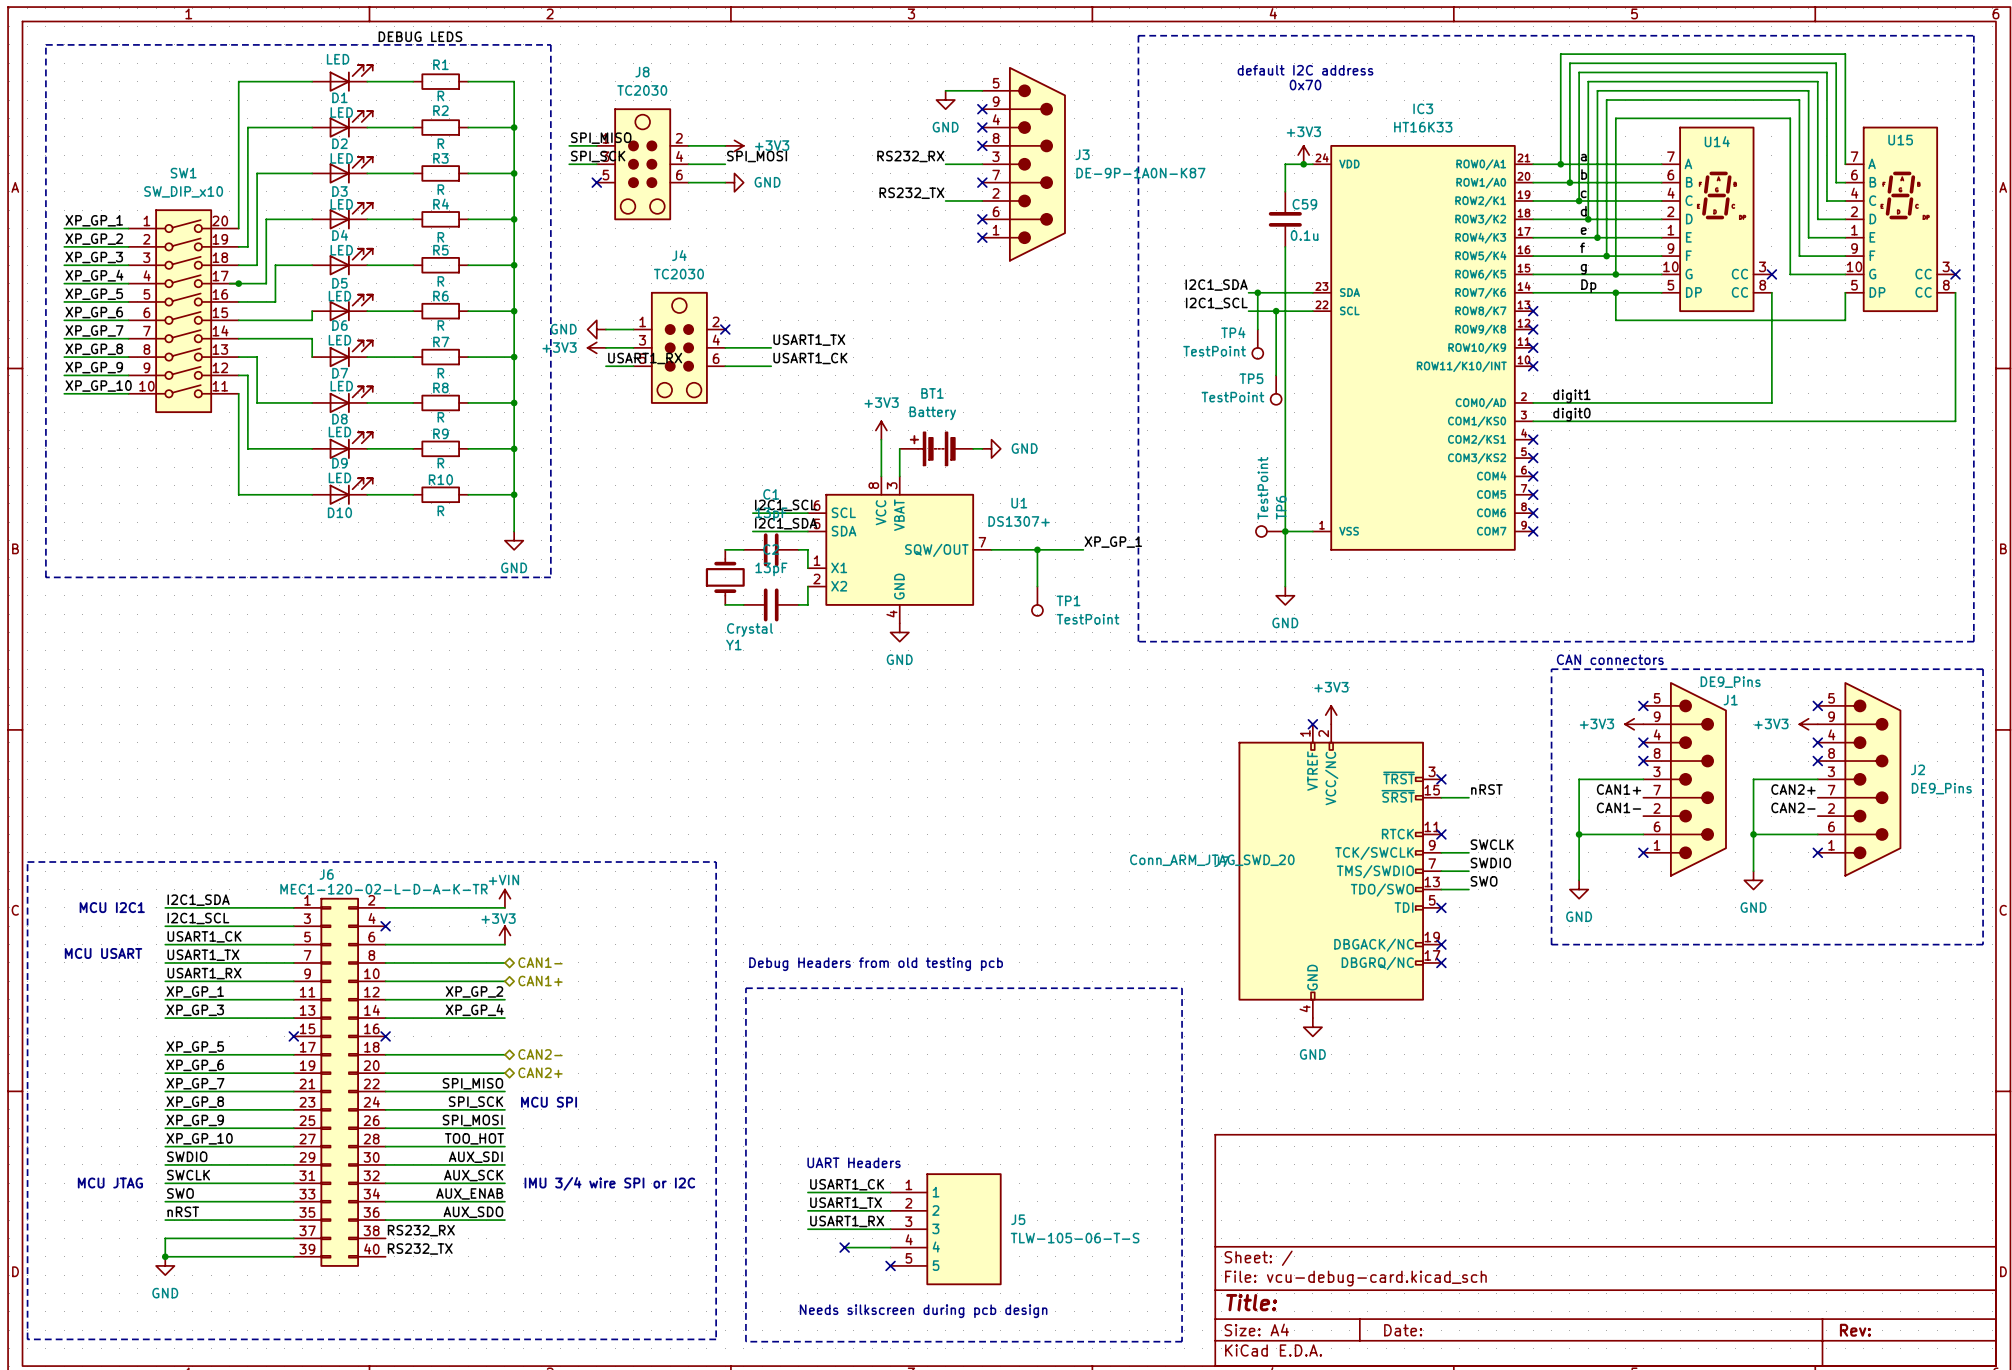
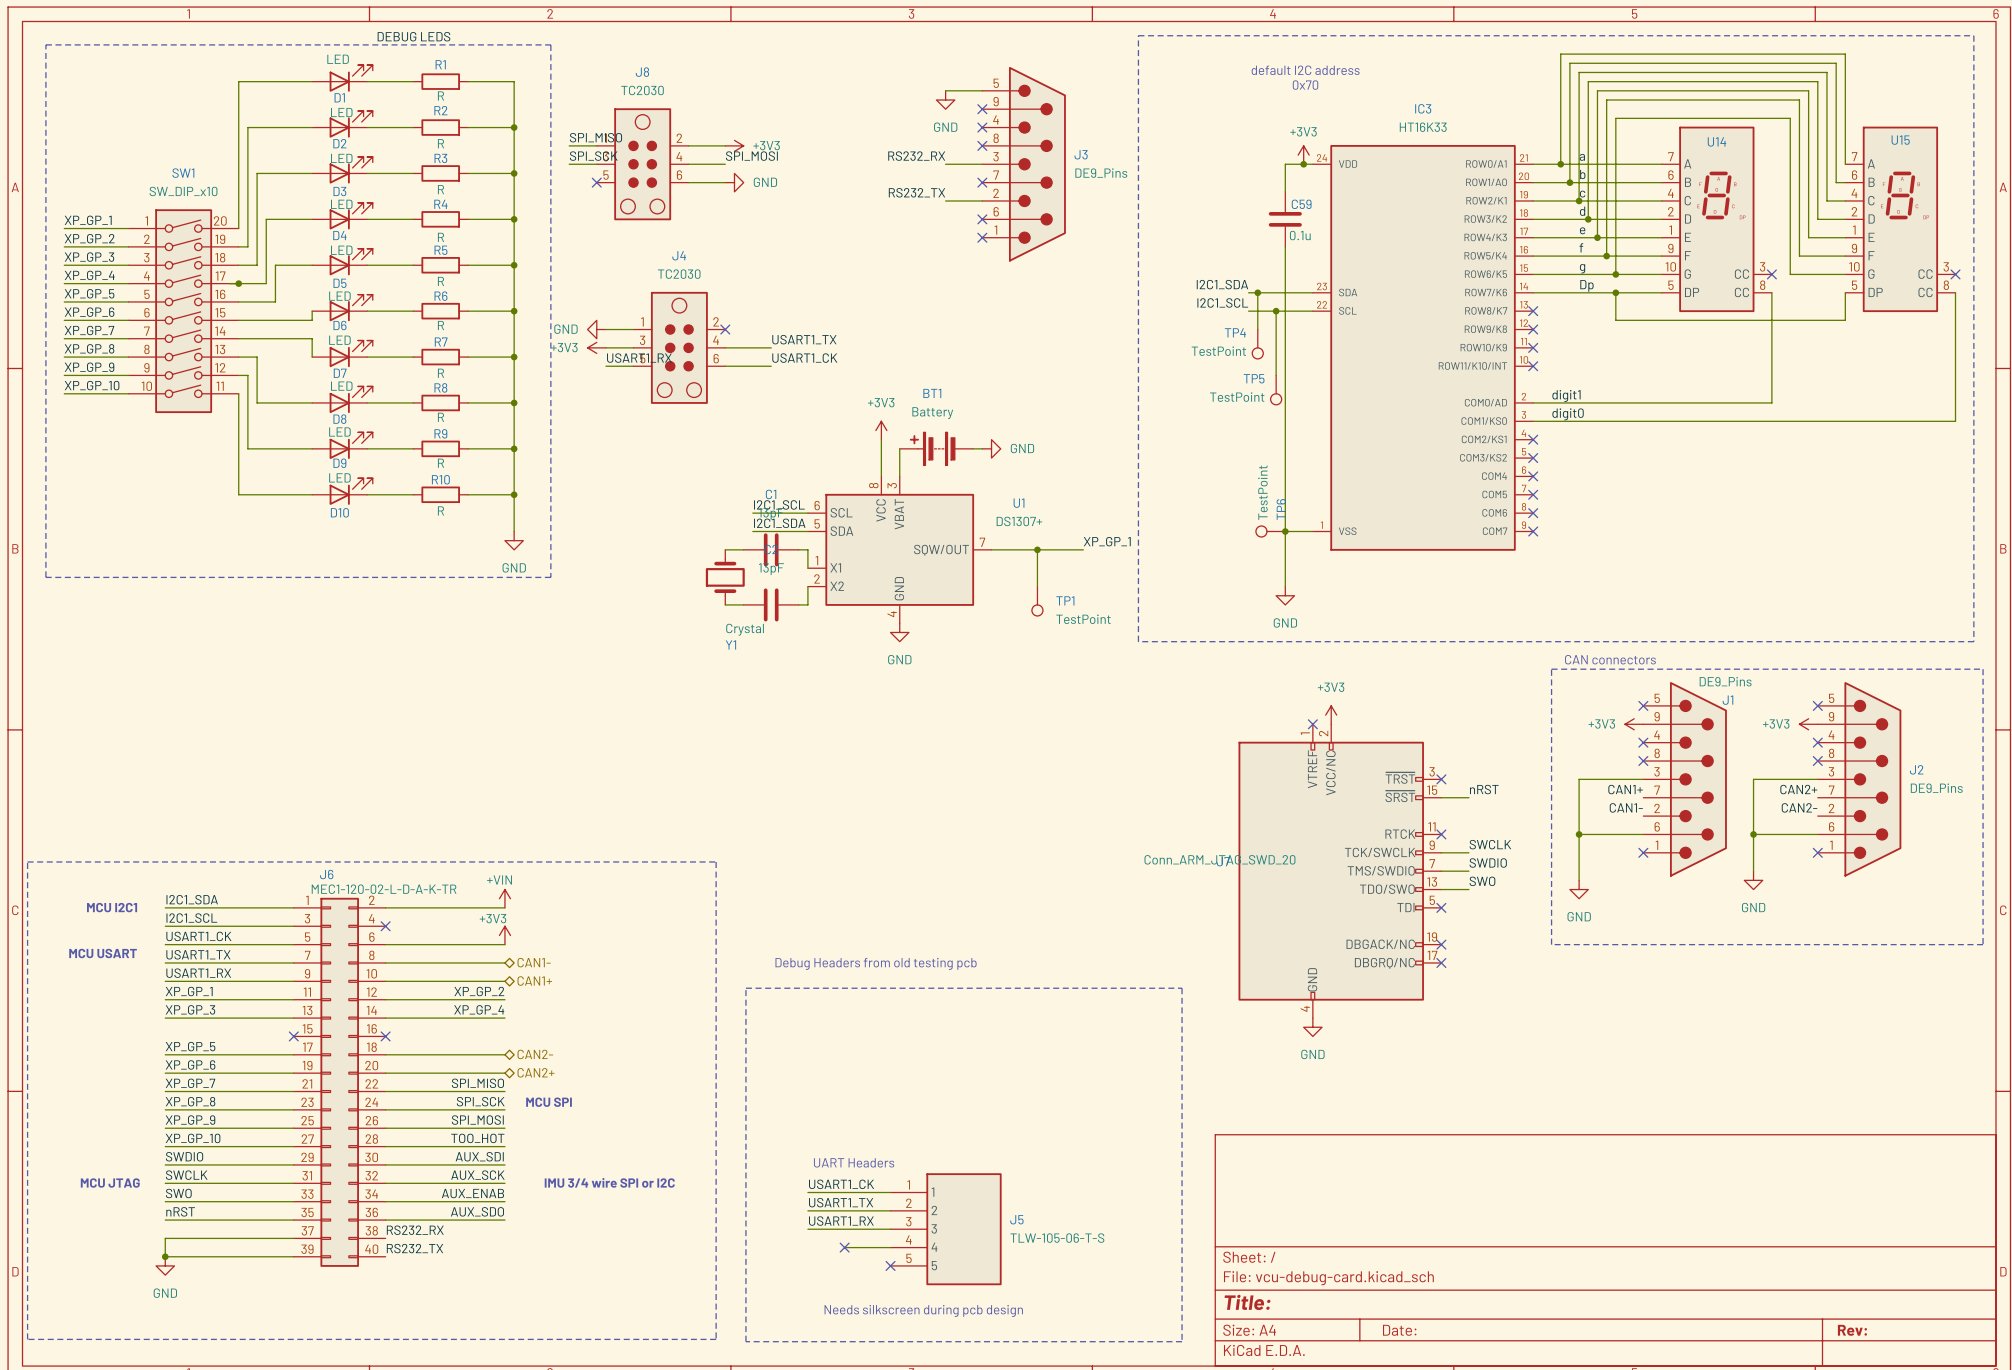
J3 value: DE-9P-1A0N-K87 (1140, 173) -> DE9_Pins (1101, 173)

